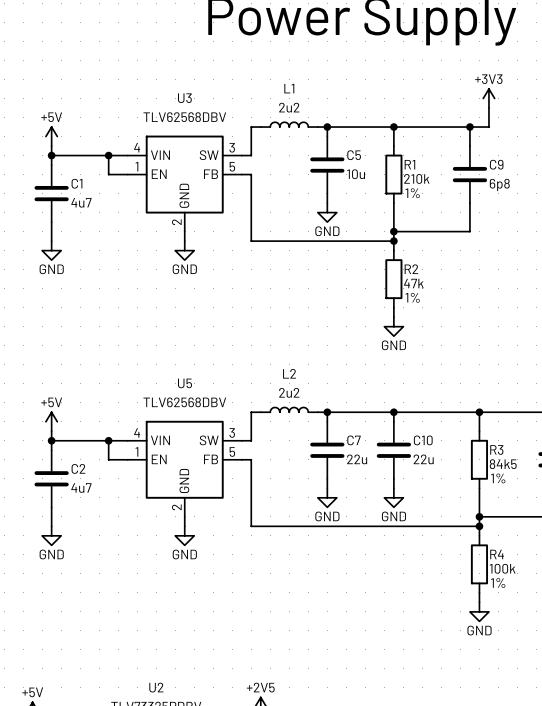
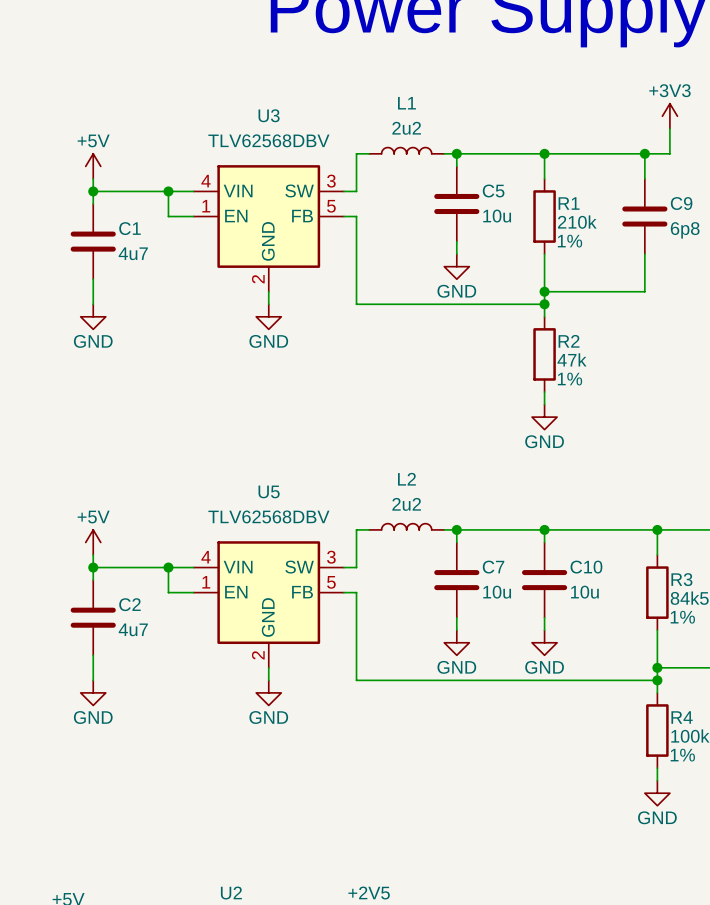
C7 value: 22u (357, 459) -> 10u (497, 592)
C10 value: 22u (423, 459) -> 10u (584, 592)

